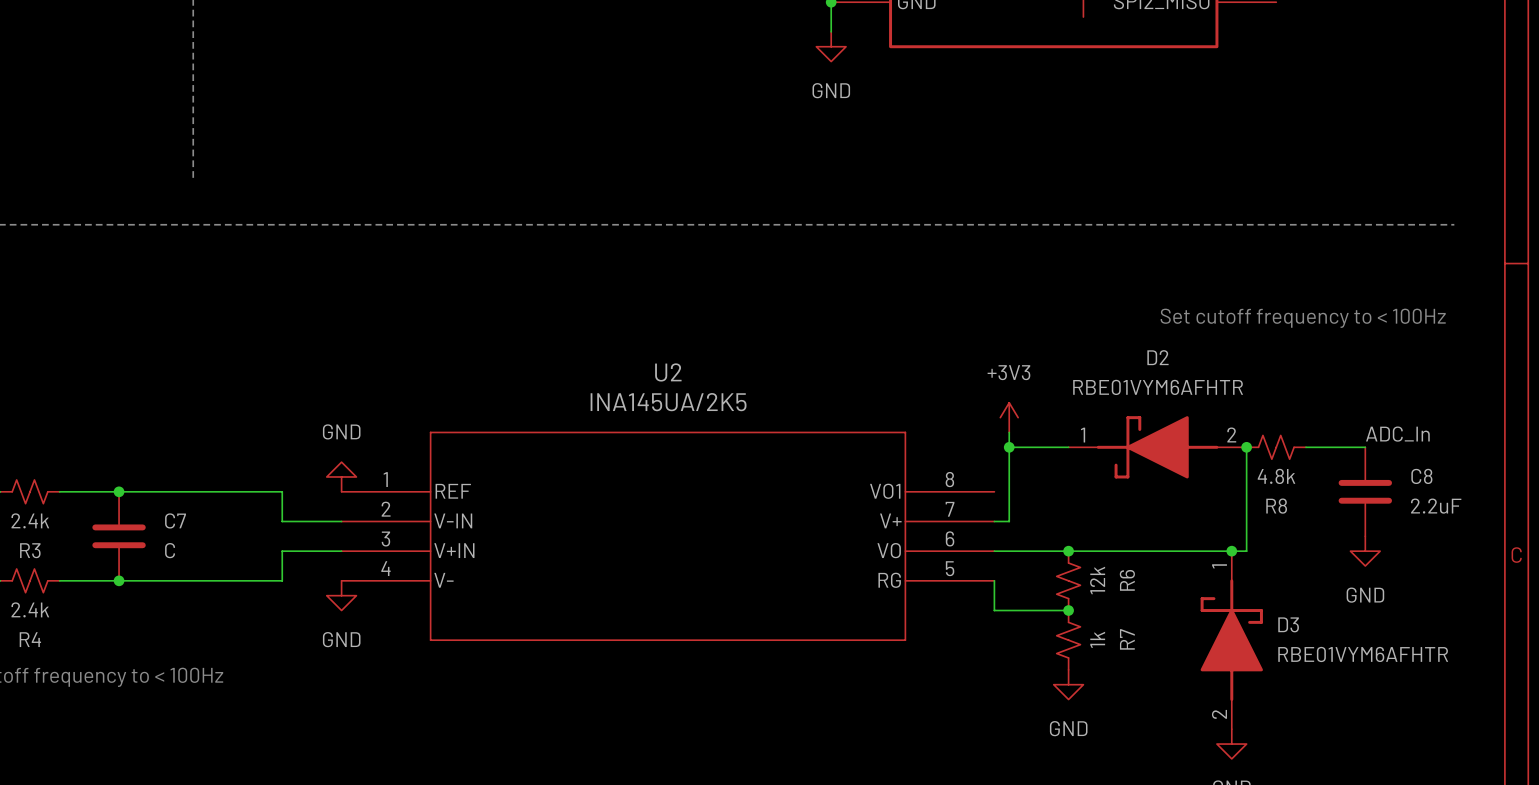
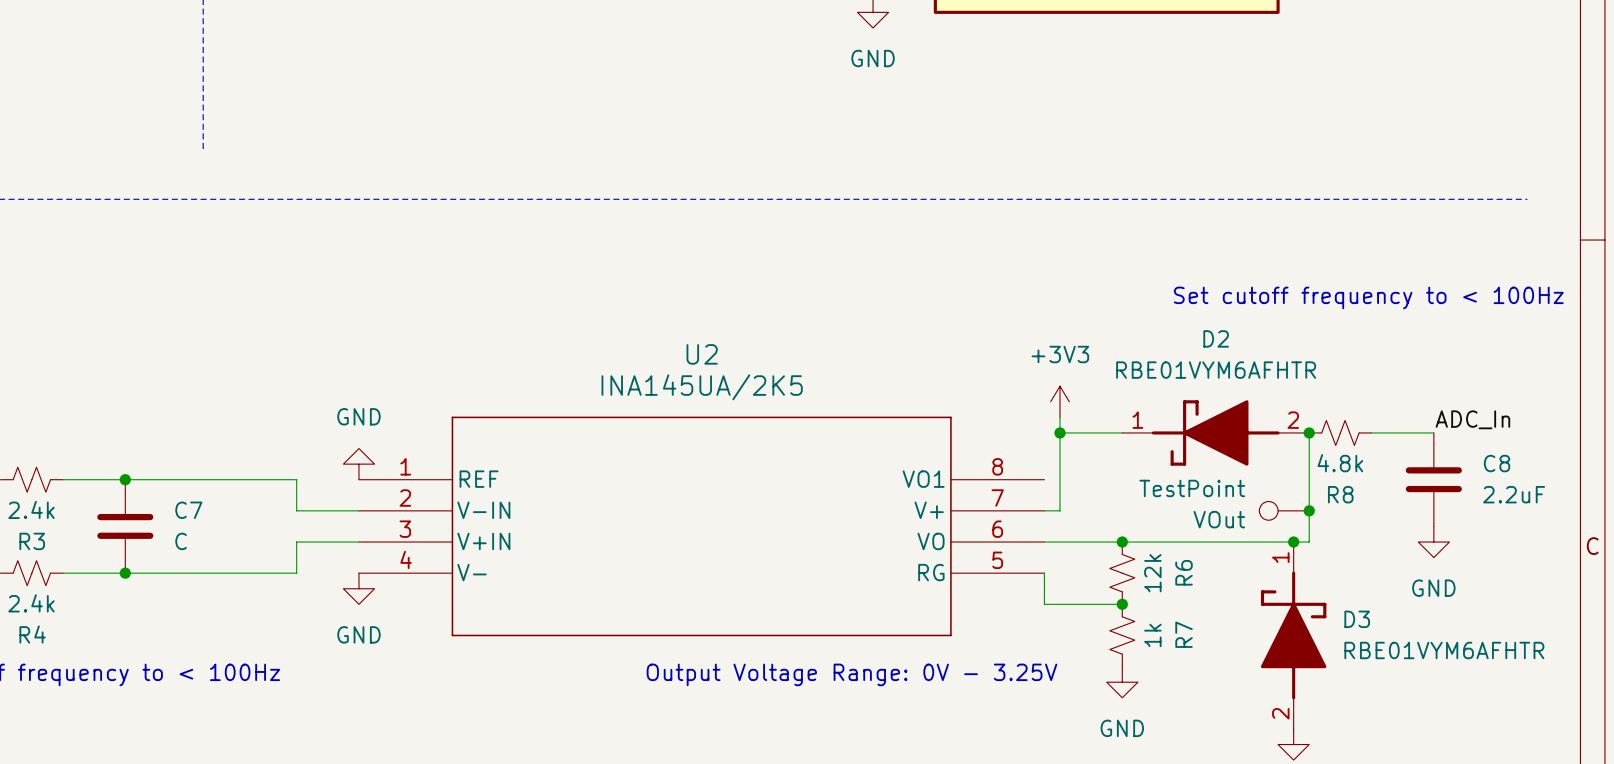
VOut: none -> TestPoint (1284, 510)
junction: none -> (1309, 510)
text: none -> Output Voltage Range: 0V - 3.25V (851, 674)

